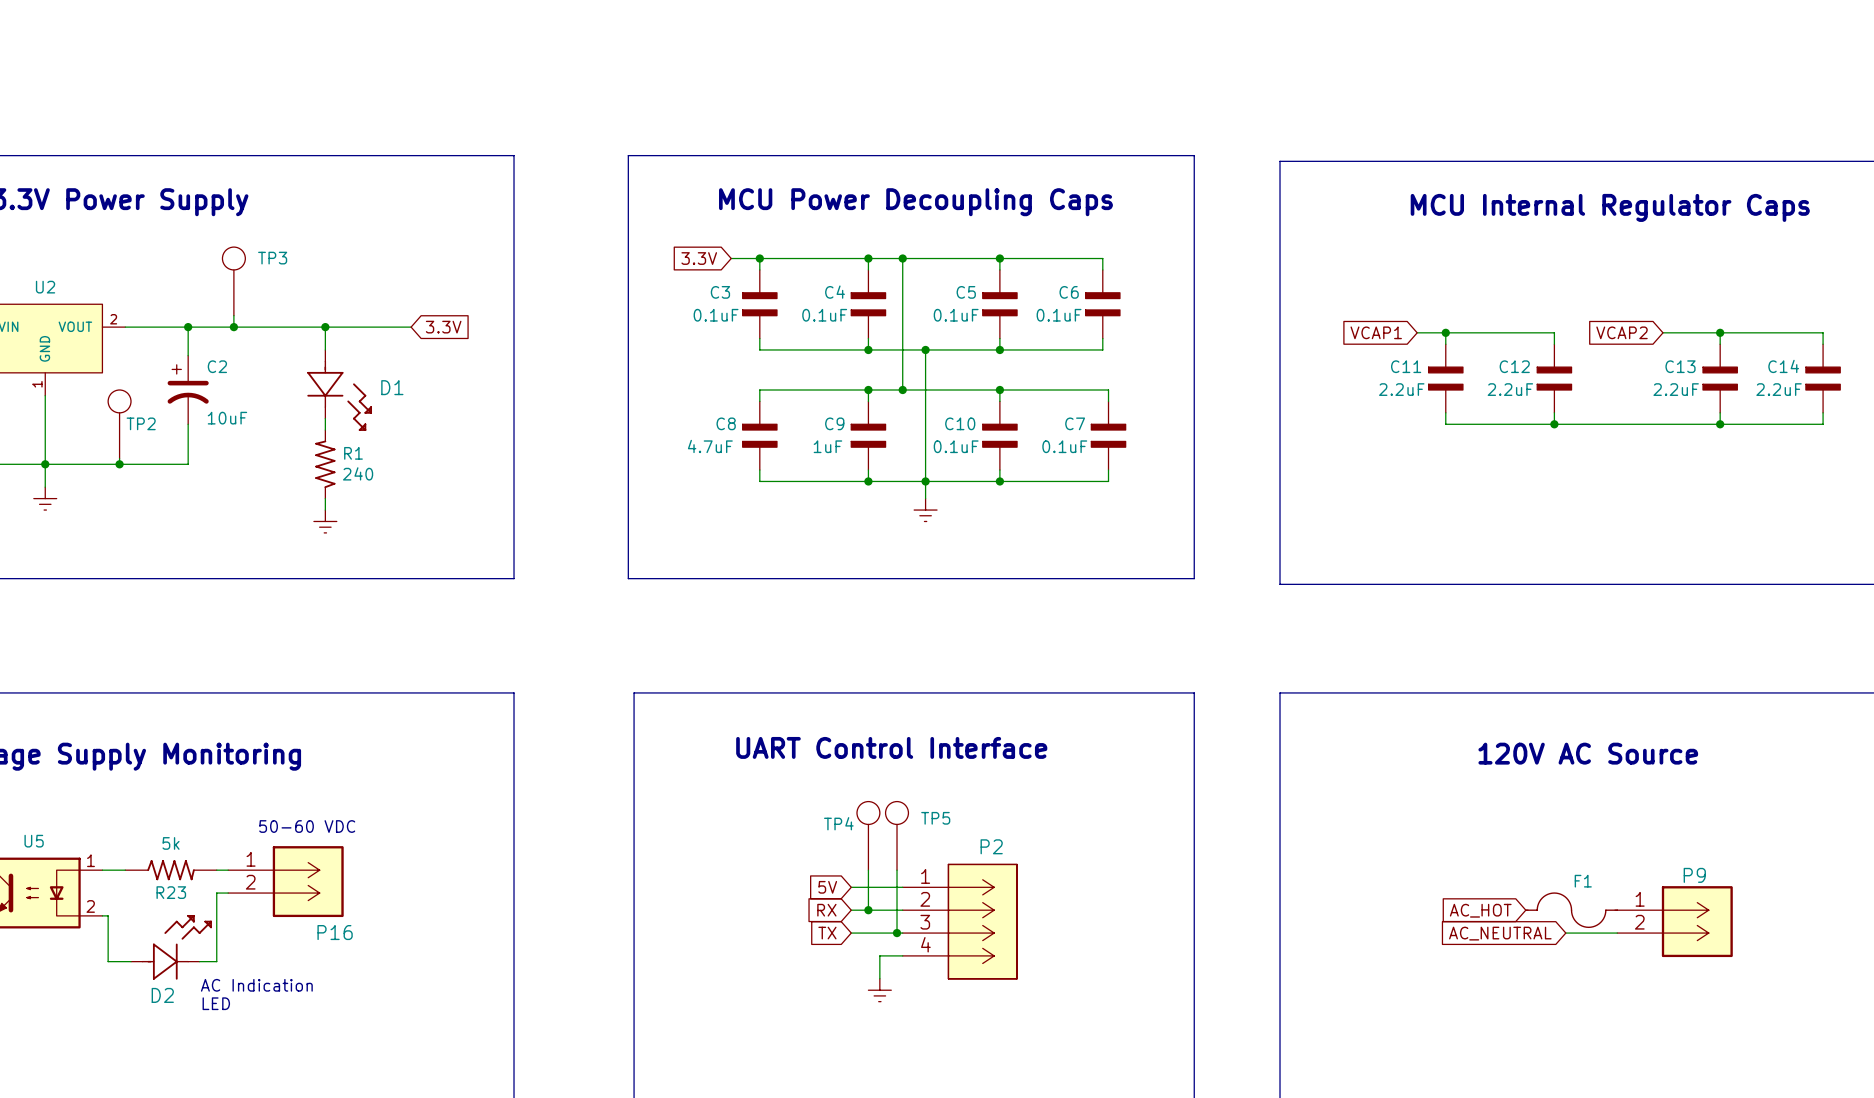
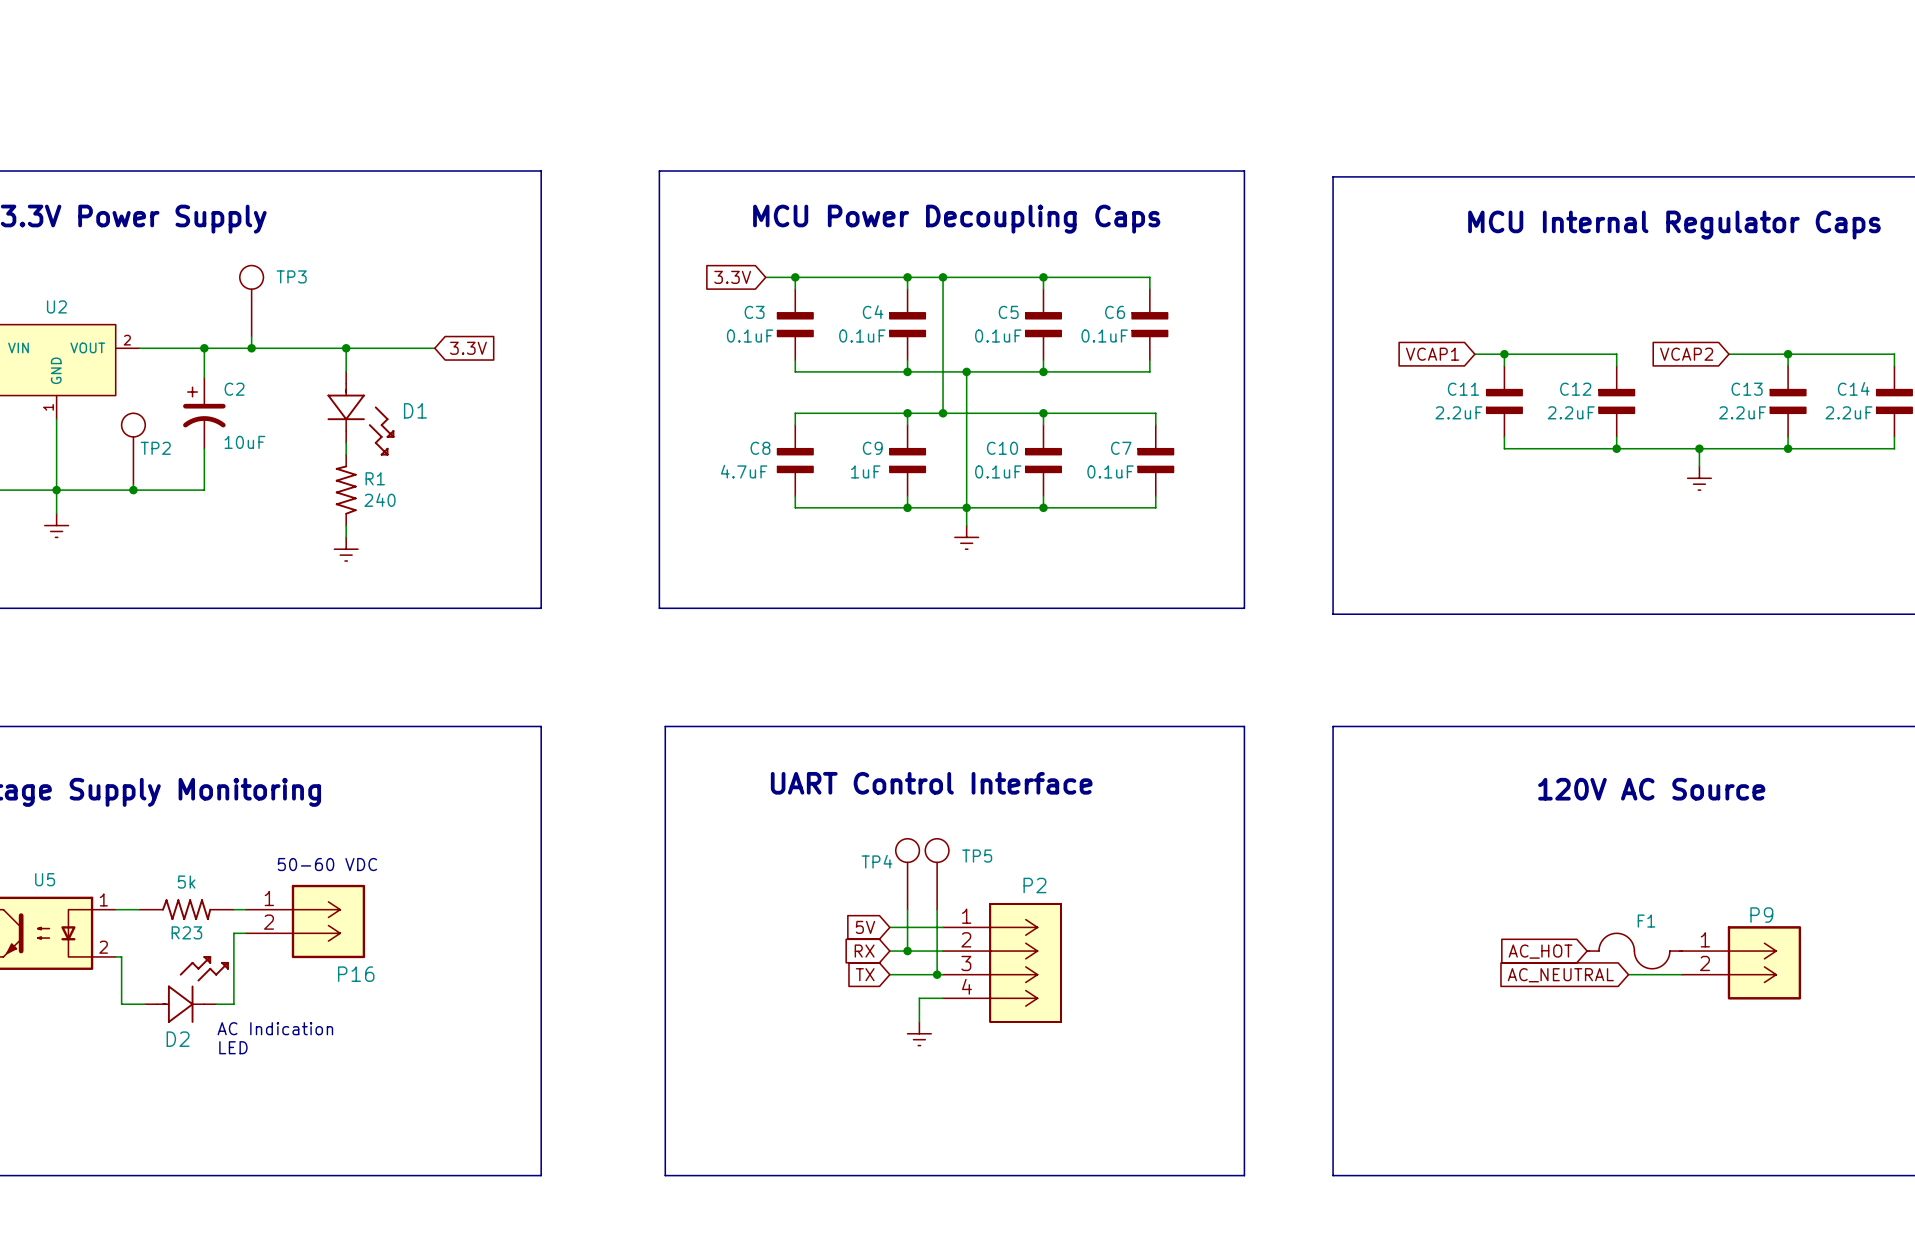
wire: none -> (1699, 448) (1699, 466)
junction: none -> (1699, 448)
power symbol: none -> (1699, 478)

